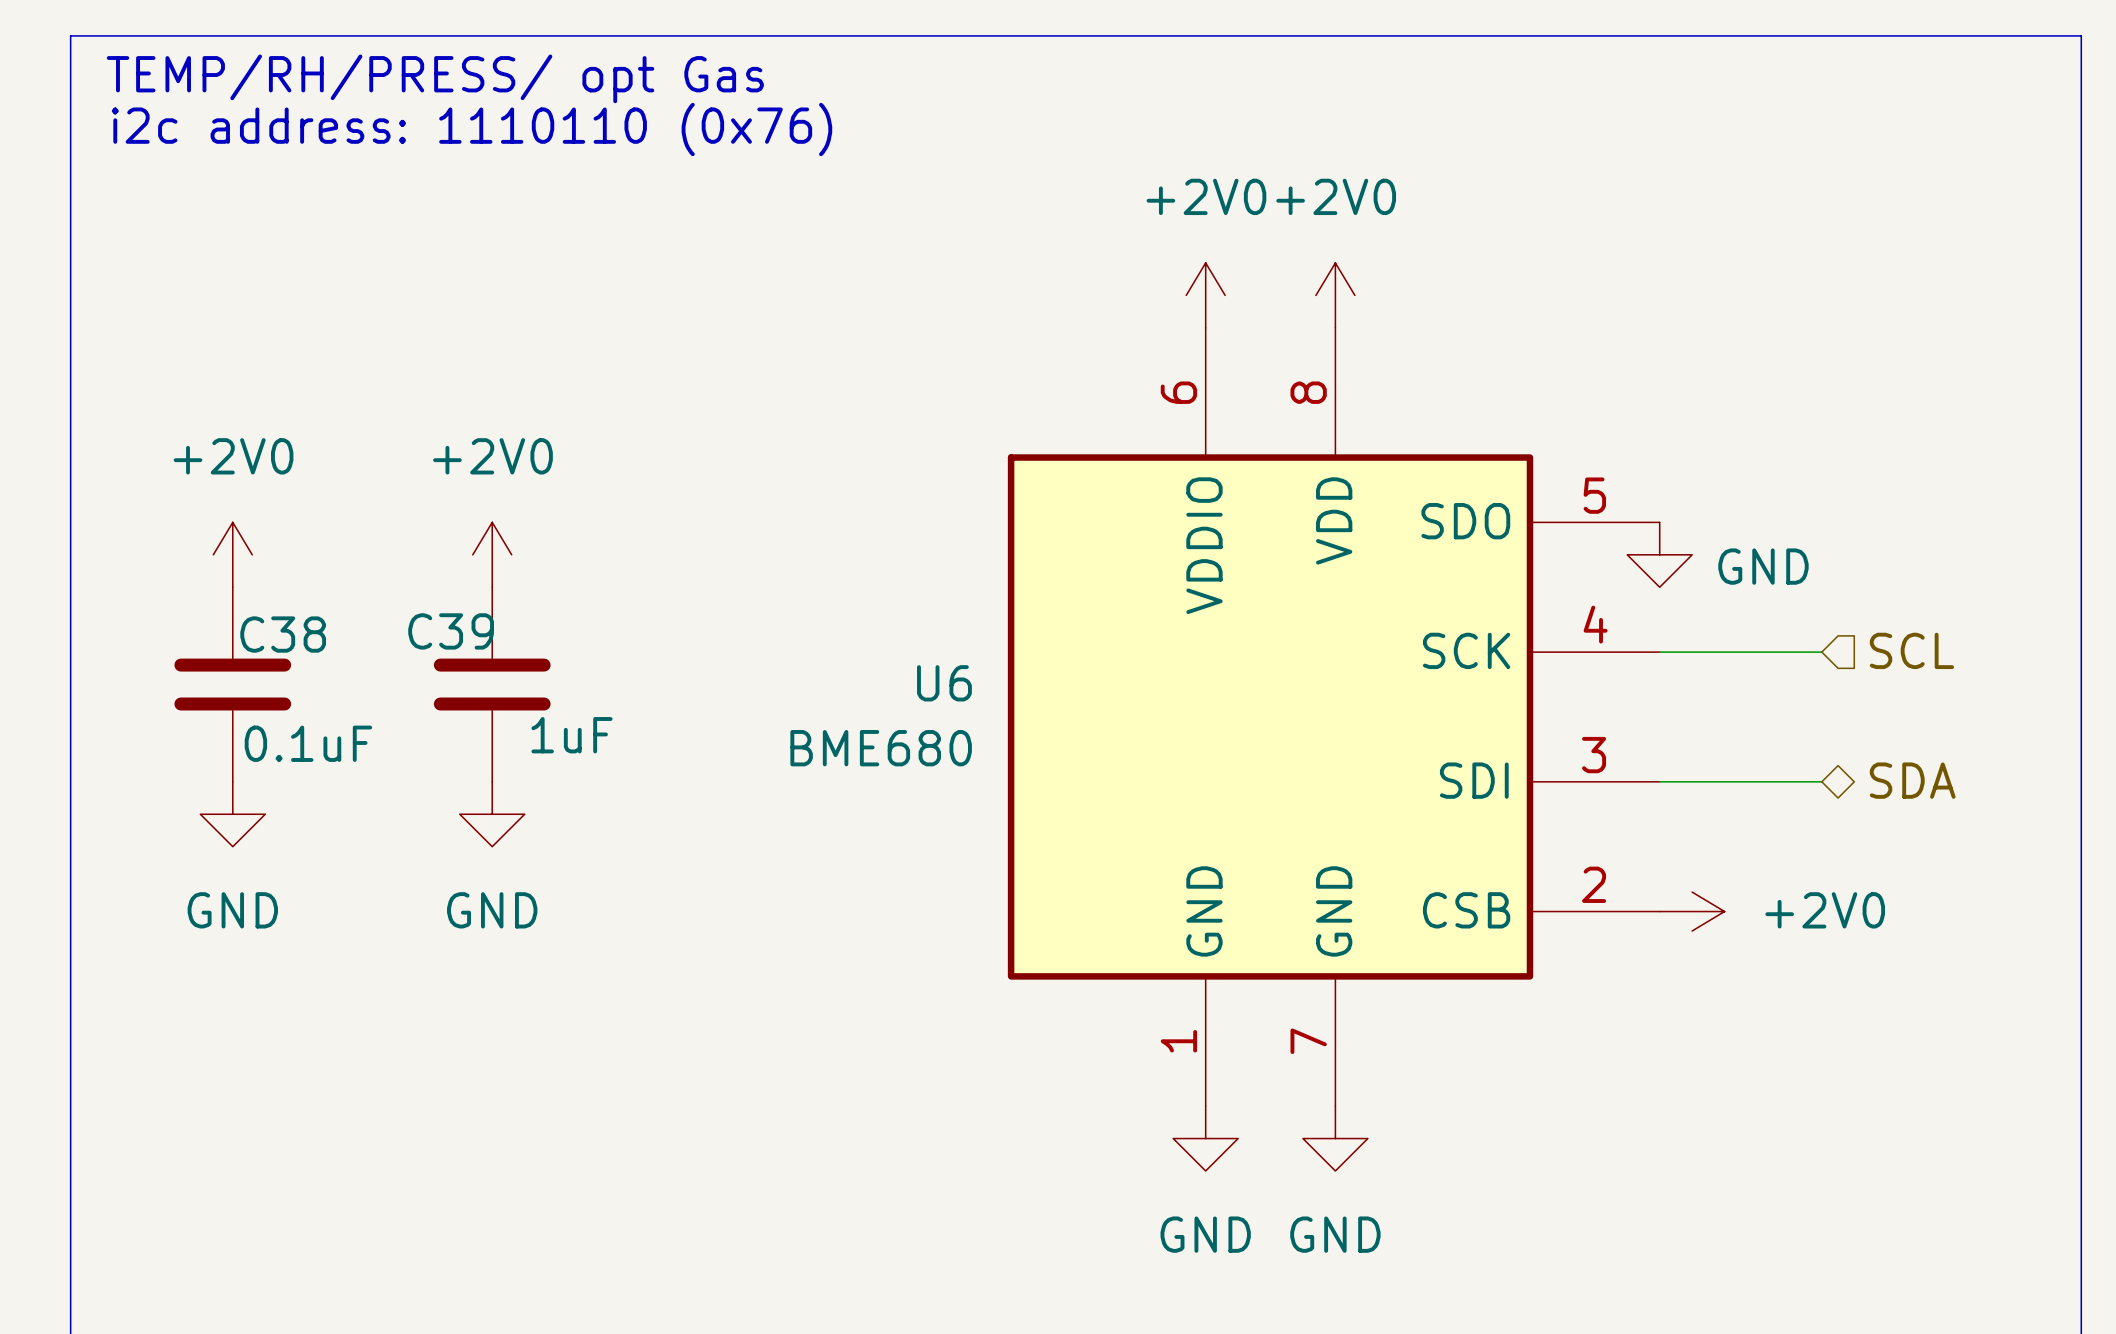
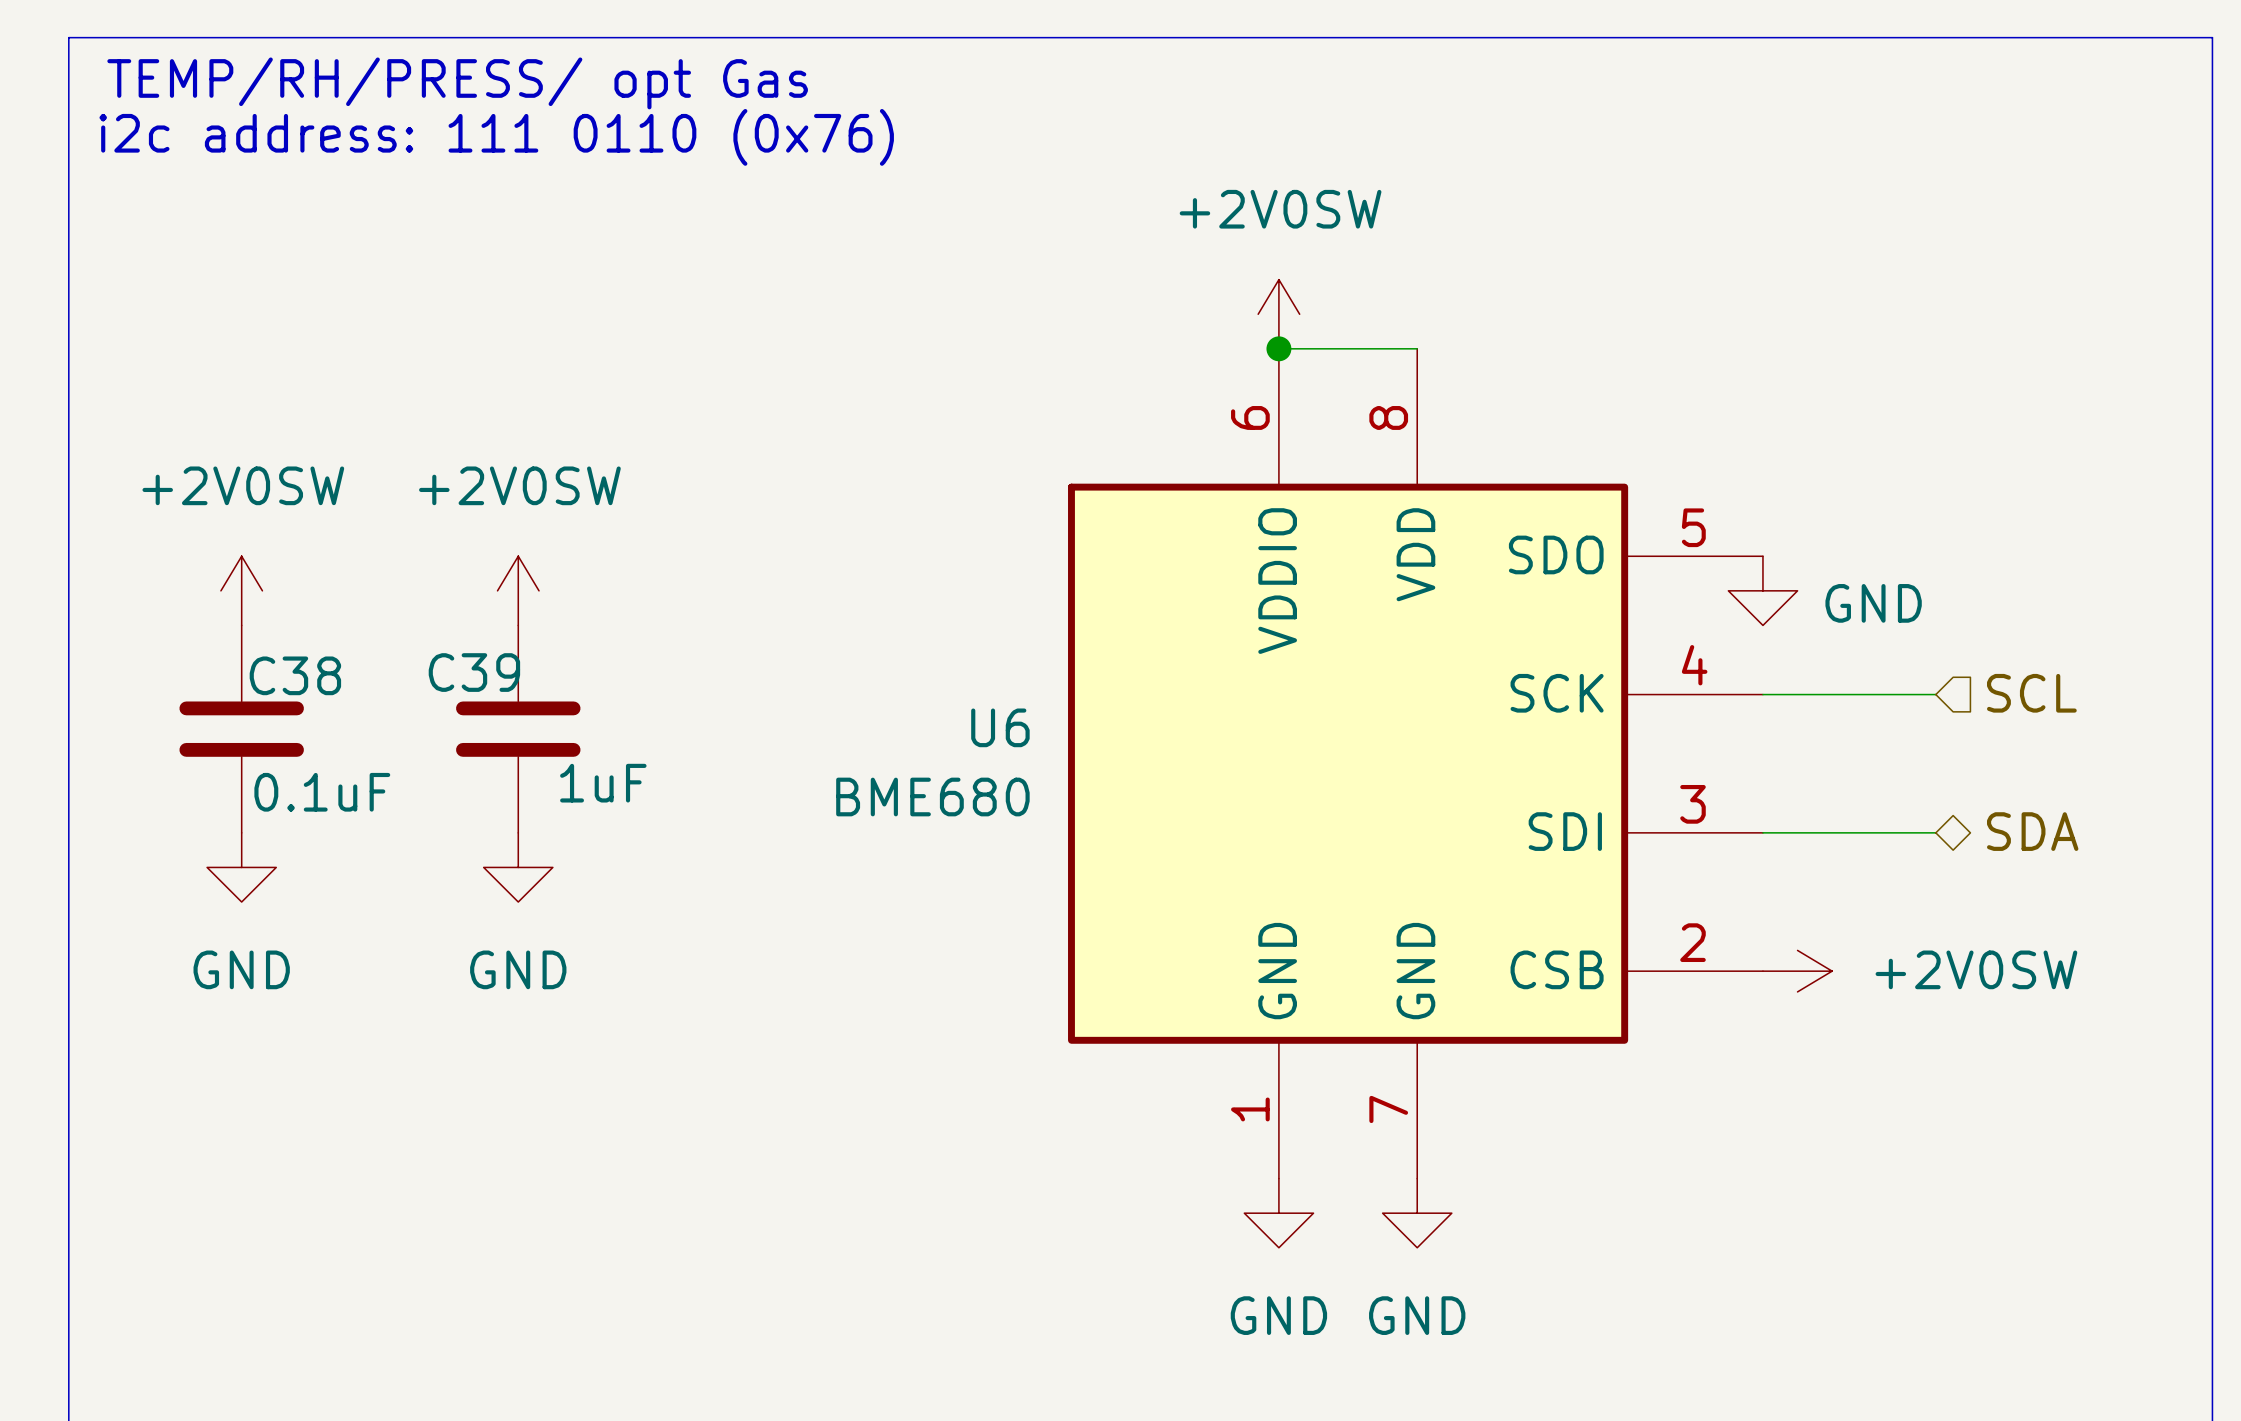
text: i2c address: 1110110 (0x76) (472, 129) -> i2c address: 111 0110 (0x76) (496, 137)
power symbol: +2V0 (1205, 295) -> +2V0SW (1278, 314)
power symbol: +2V0 (1335, 295) -> none
wire: none -> (1278, 348) (1417, 348)
junction: none -> (1278, 348)
power symbol: +2V0 (232, 554) -> +2V0SW (241, 590)
power symbol: +2V0 (492, 554) -> +2V0SW (518, 590)
power symbol: +2V0 (1692, 911) -> +2V0SW (1797, 971)

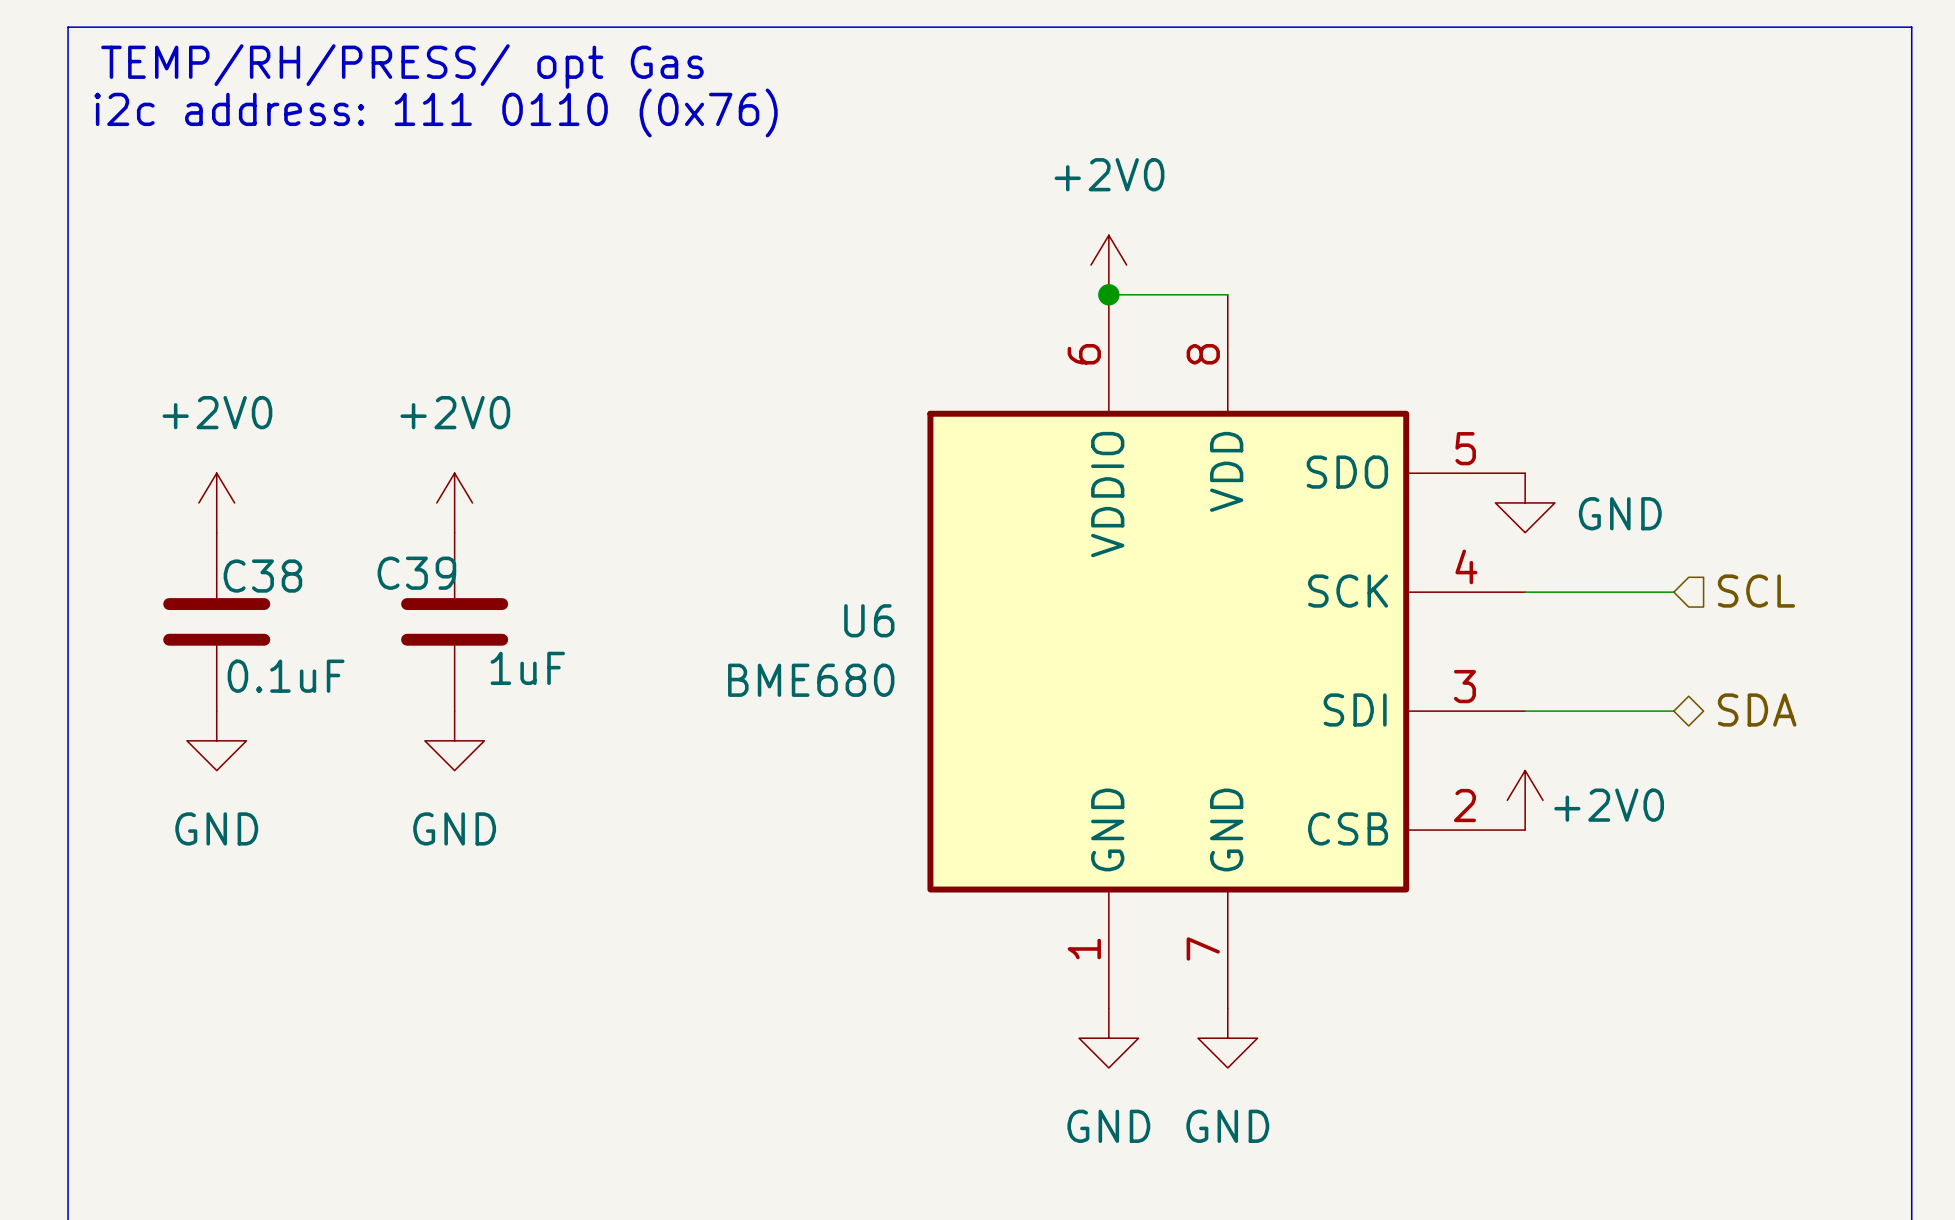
power symbol: +2V0SW (1278, 314) -> +2V0 (1108, 265)
power symbol: +2V0SW (241, 590) -> +2V0 (216, 502)
power symbol: +2V0SW (518, 590) -> +2V0 (454, 502)
power symbol: none -> +2V0 (1525, 800)
power symbol: +2V0SW (1797, 971) -> none

